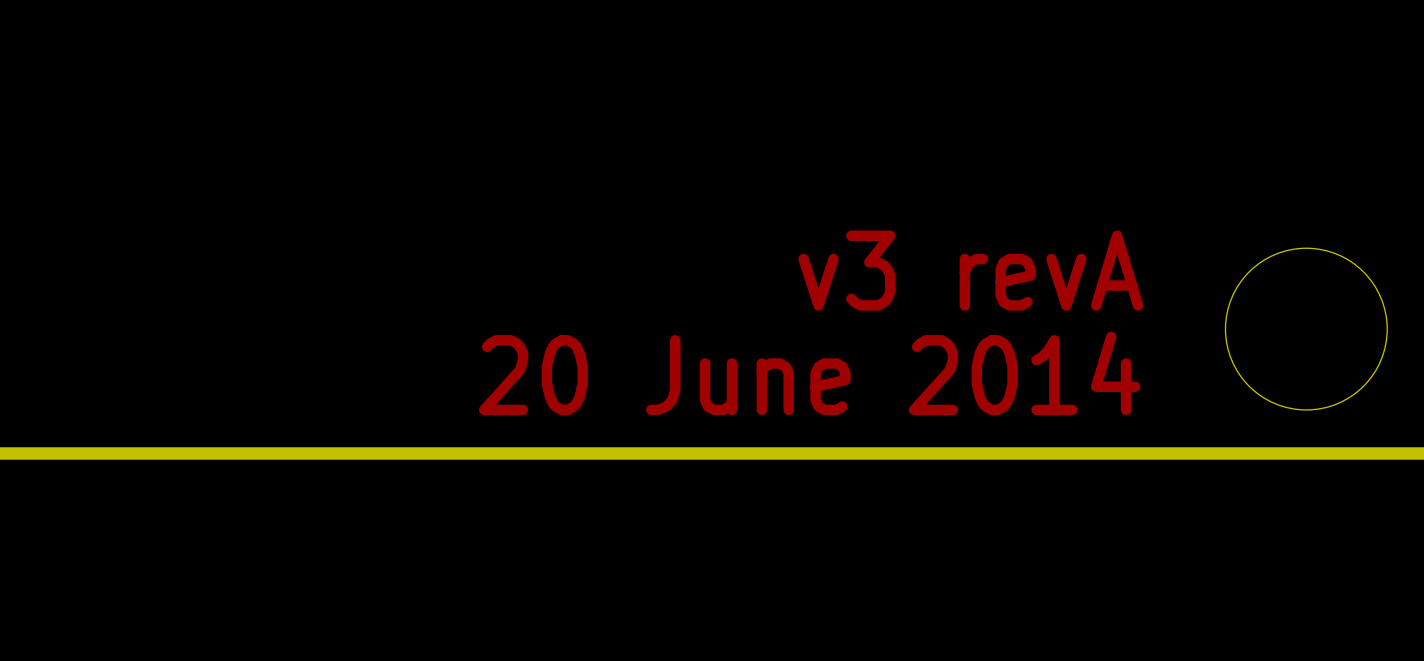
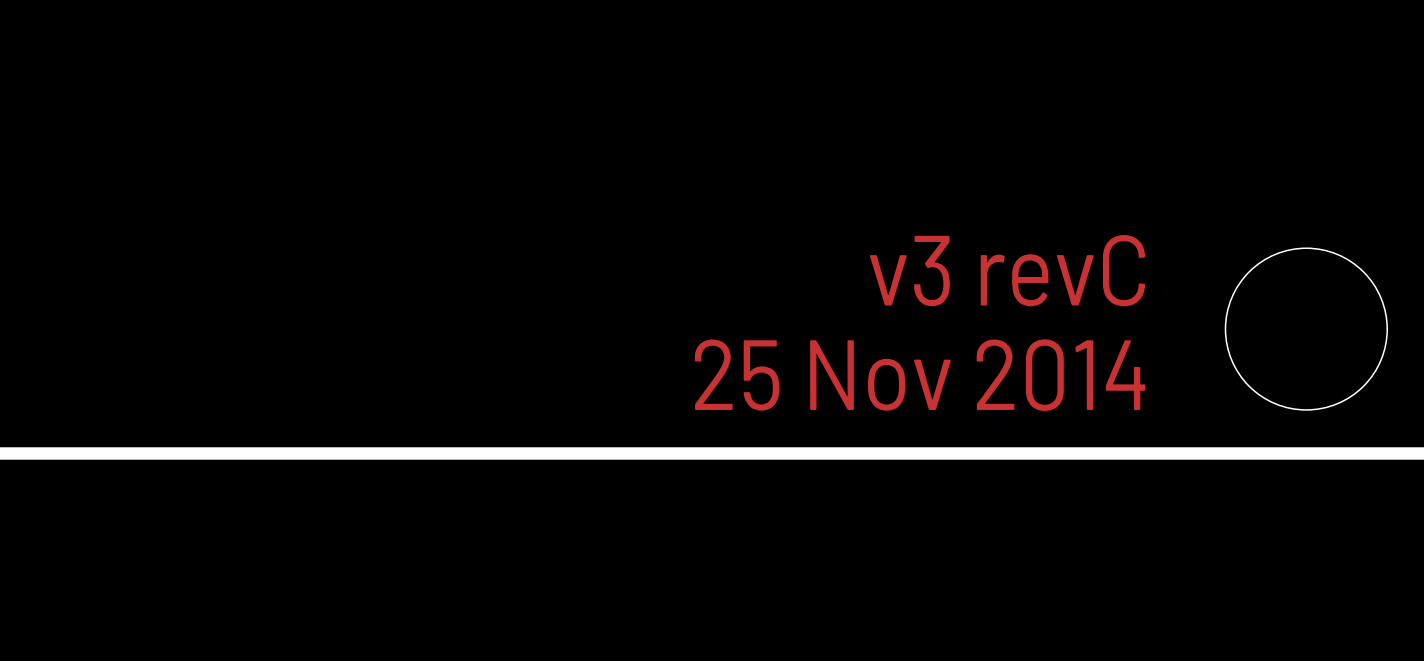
text: v3 revA (970, 270) -> v3 revC (1007, 270)
text: 20 June 2014 (809, 373) -> 25 Nov 2014 (920, 375)

